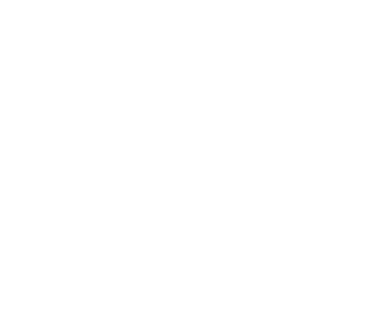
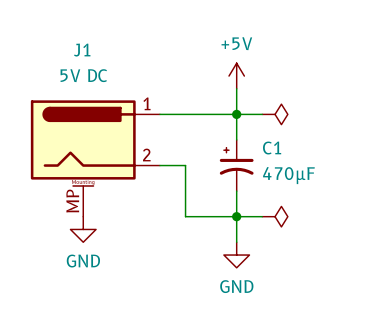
power symbol: none -> +5V (236, 76)
wire: none -> (236, 88) (236, 139)
wire: none -> (159, 114) (262, 114)
junction: none -> (236, 114)
power symbol: none -> (275, 114)
J1: none -> 5V DC (95, 158)
wire: none -> (159, 165) (185, 165) (185, 216) (262, 216)
C1: none -> 470µF (236, 165)
wire: none -> (236, 191) (236, 242)
junction: none -> (236, 216)
power symbol: none -> (275, 216)
power symbol: none -> GND (83, 229)
power symbol: none -> GND (236, 255)

